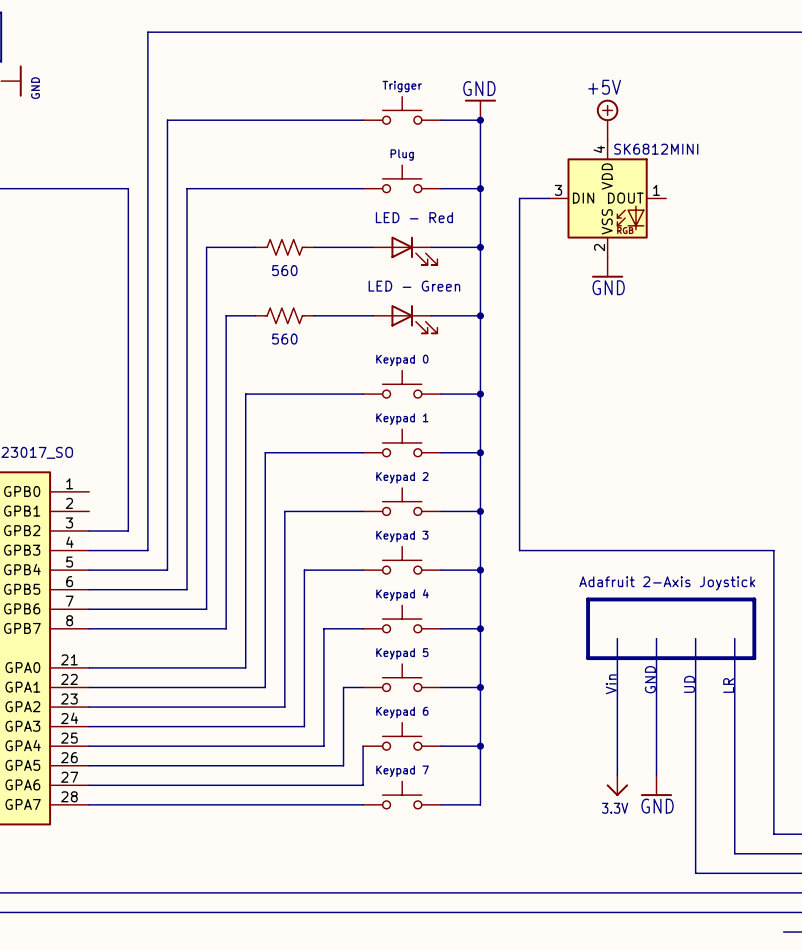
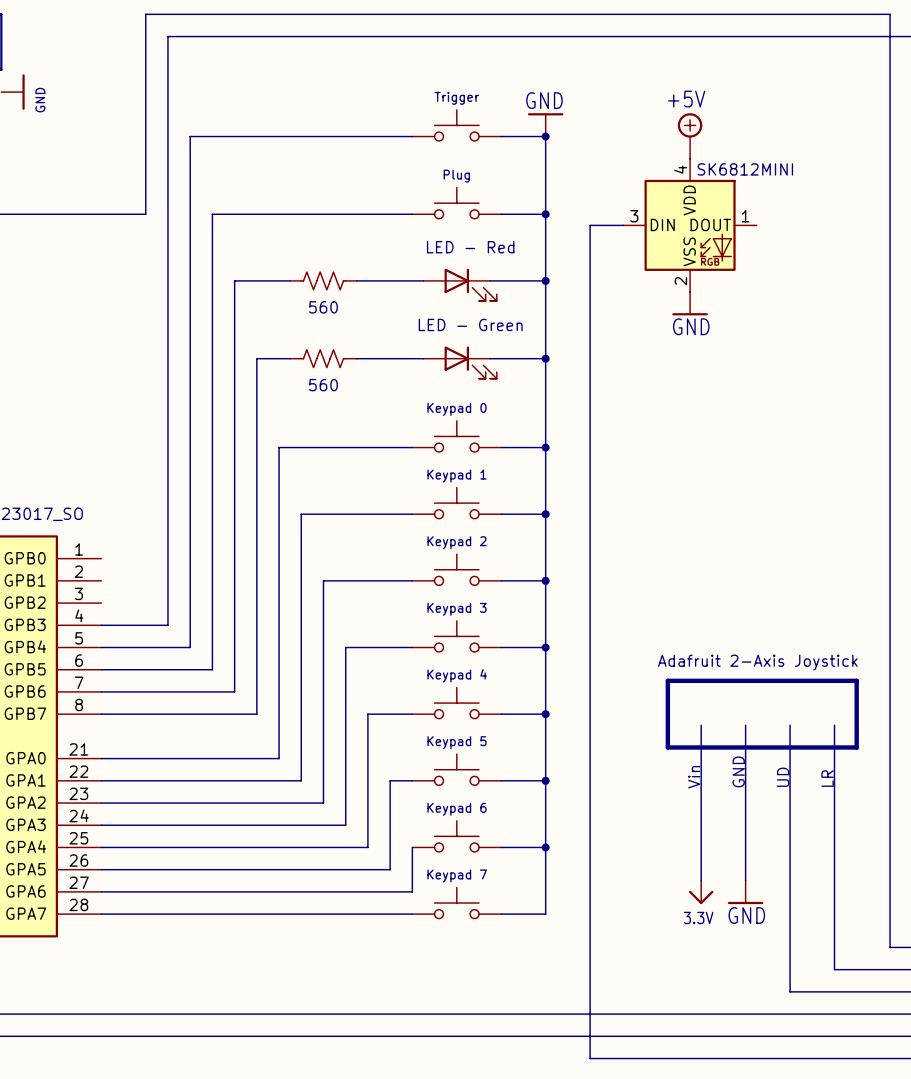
wire: (128, 188) (128, 531) (89, 531) -> (145, 214) (145, 14) (890, 14) (890, 947)
wire: (519, 550) (773, 550) (773, 834) (783, 834) -> (590, 625) (590, 1058) (890, 1058)

